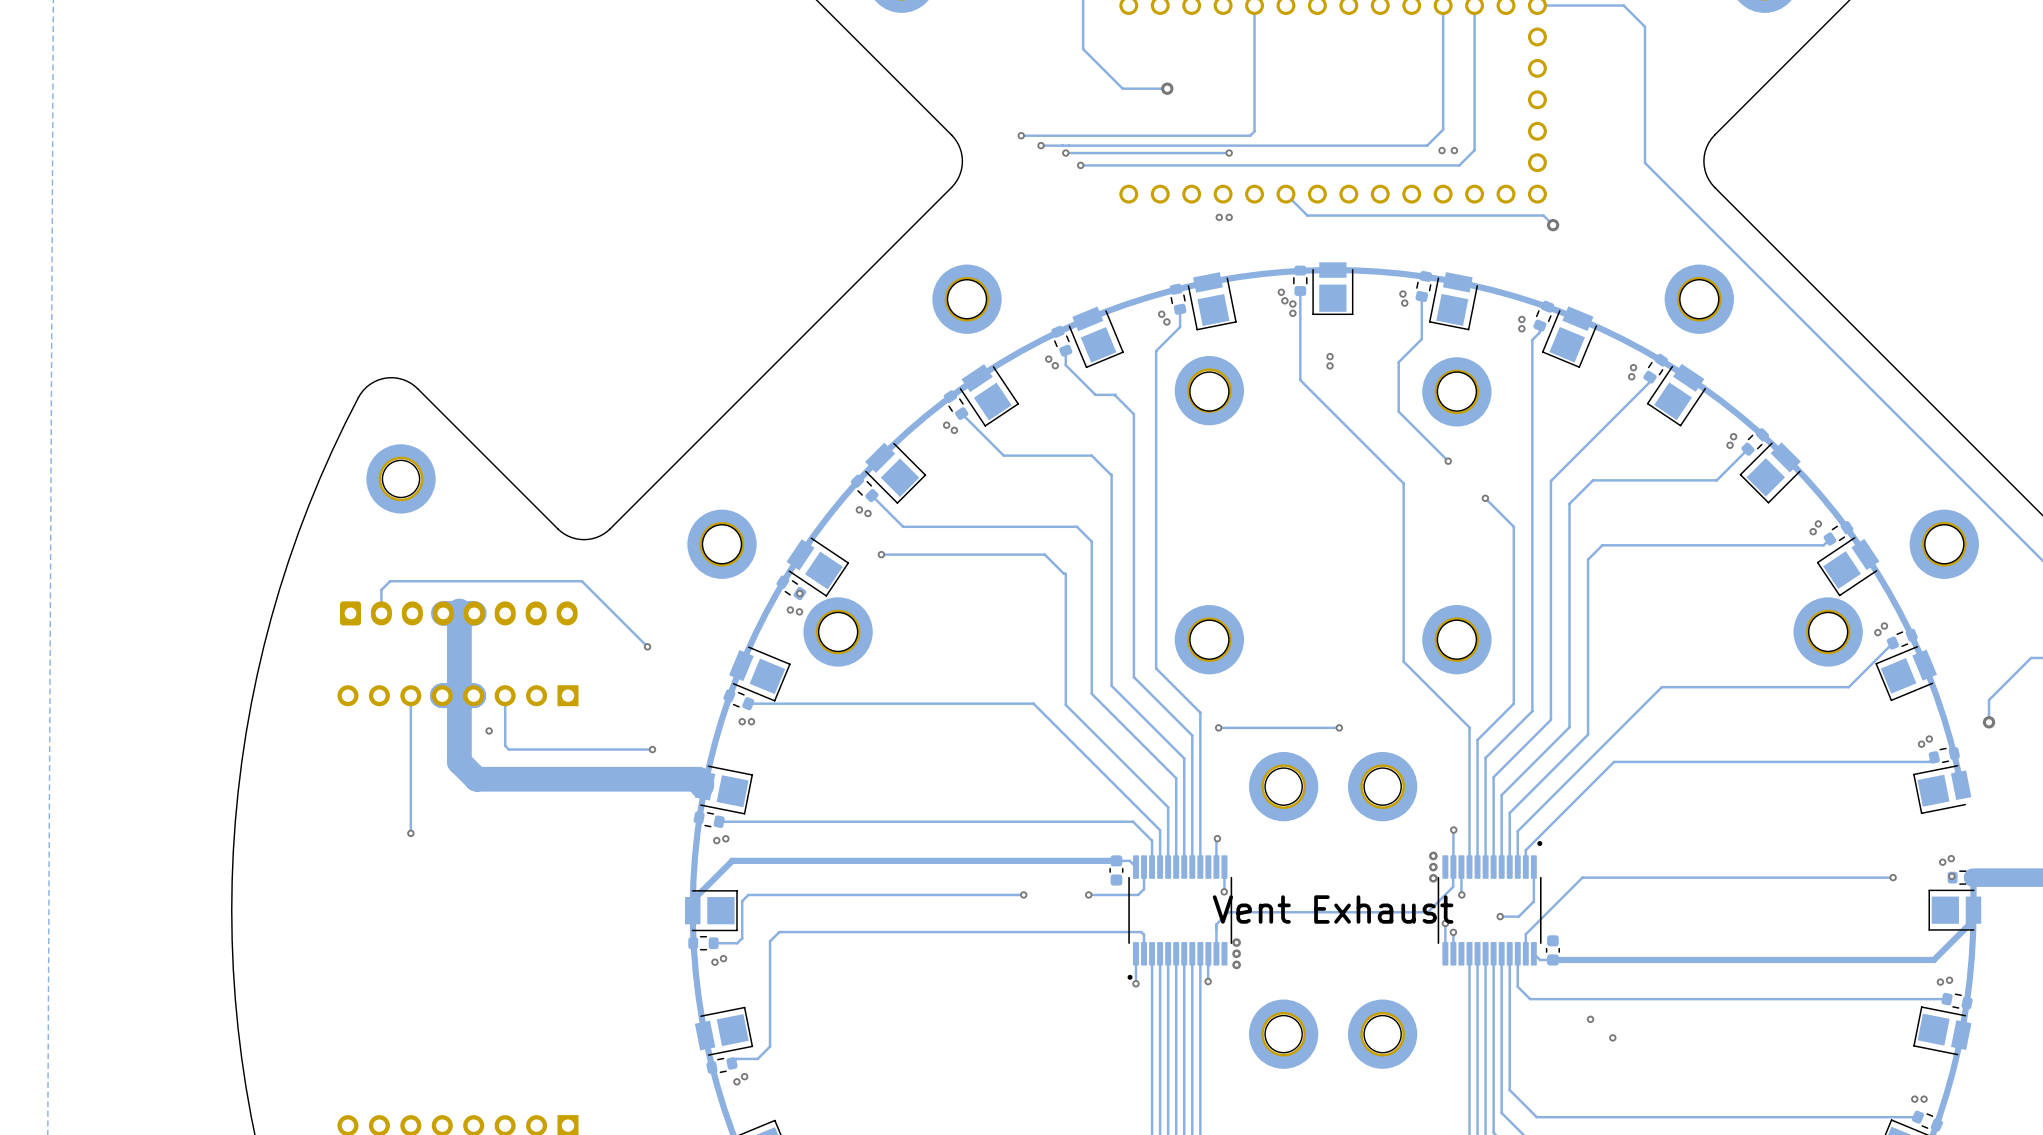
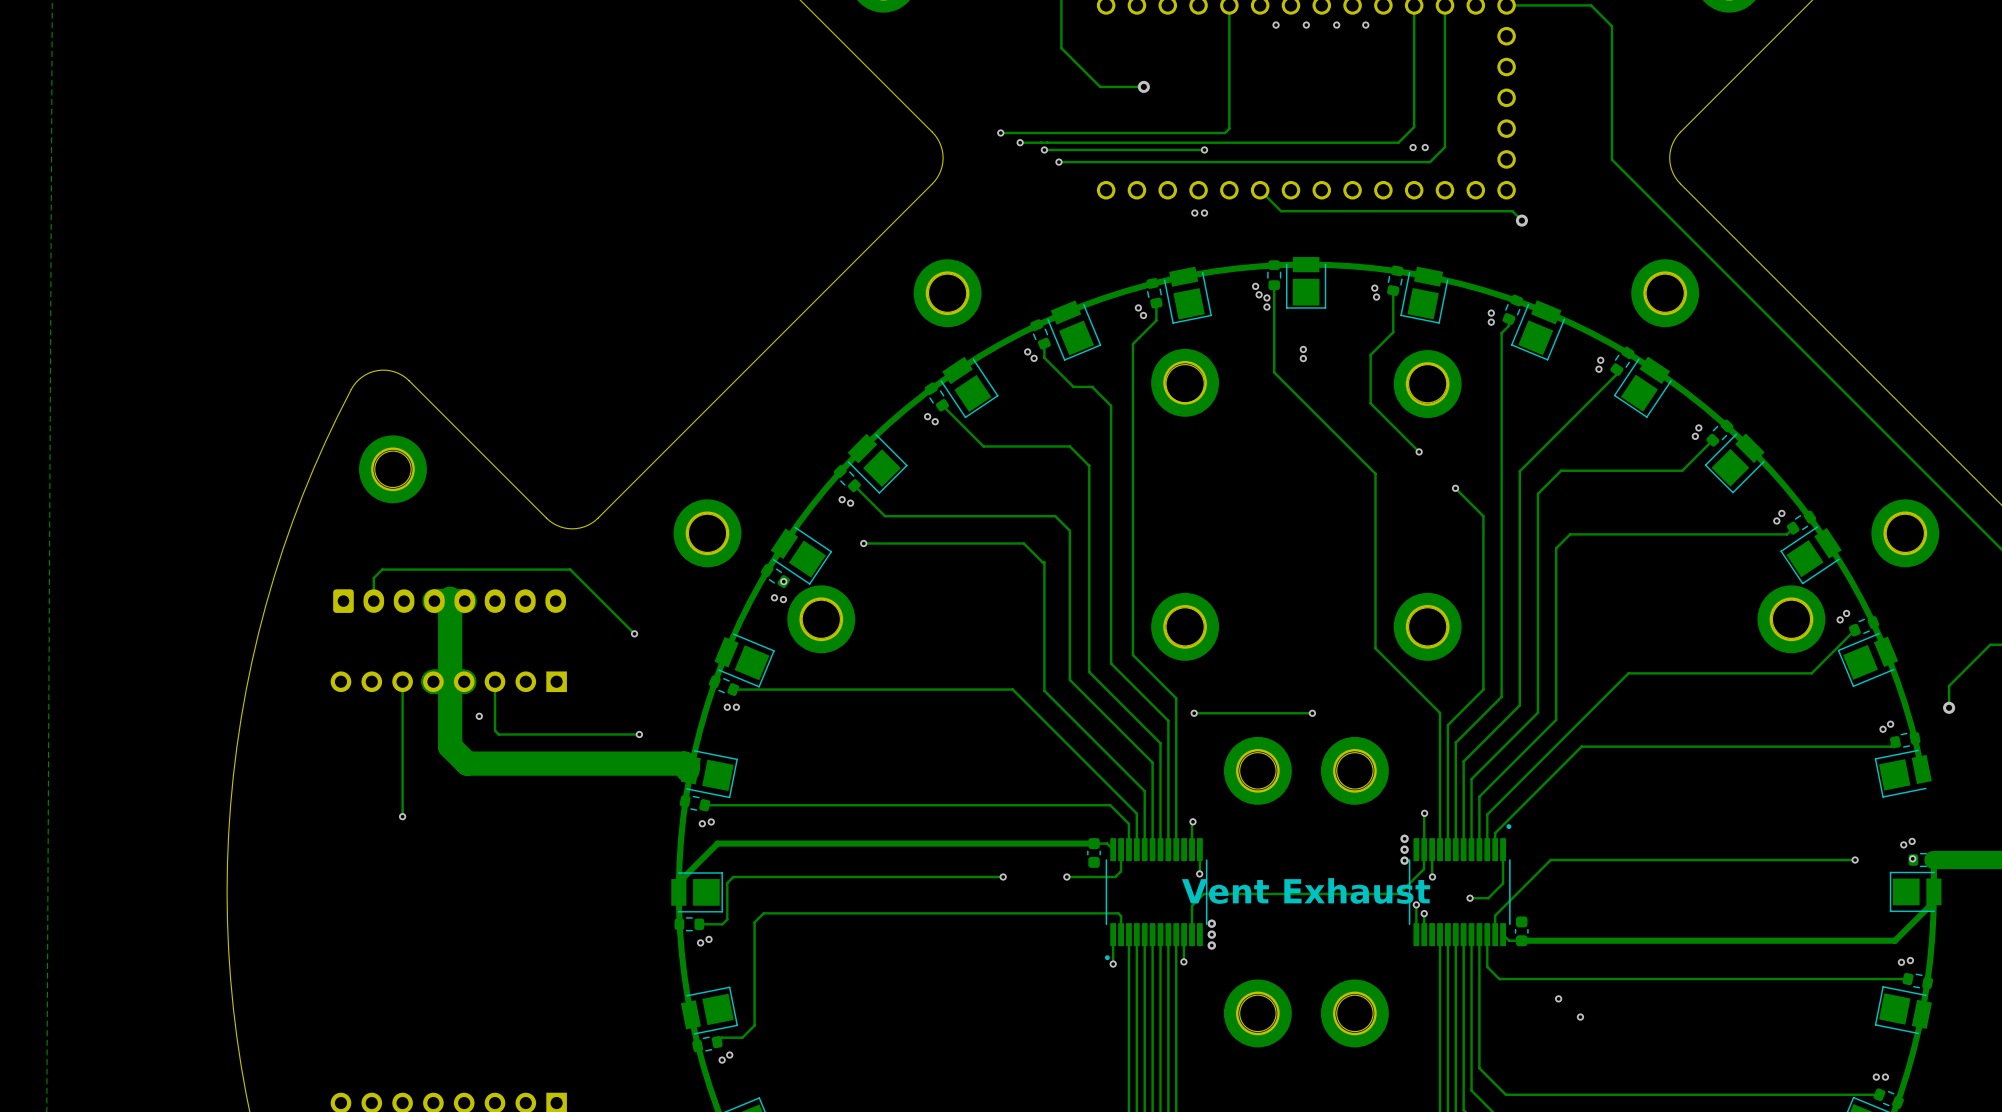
via: none -> (1276, 25)
via: none -> (1306, 25)
via: none -> (1336, 25)
via: none -> (1365, 25)

